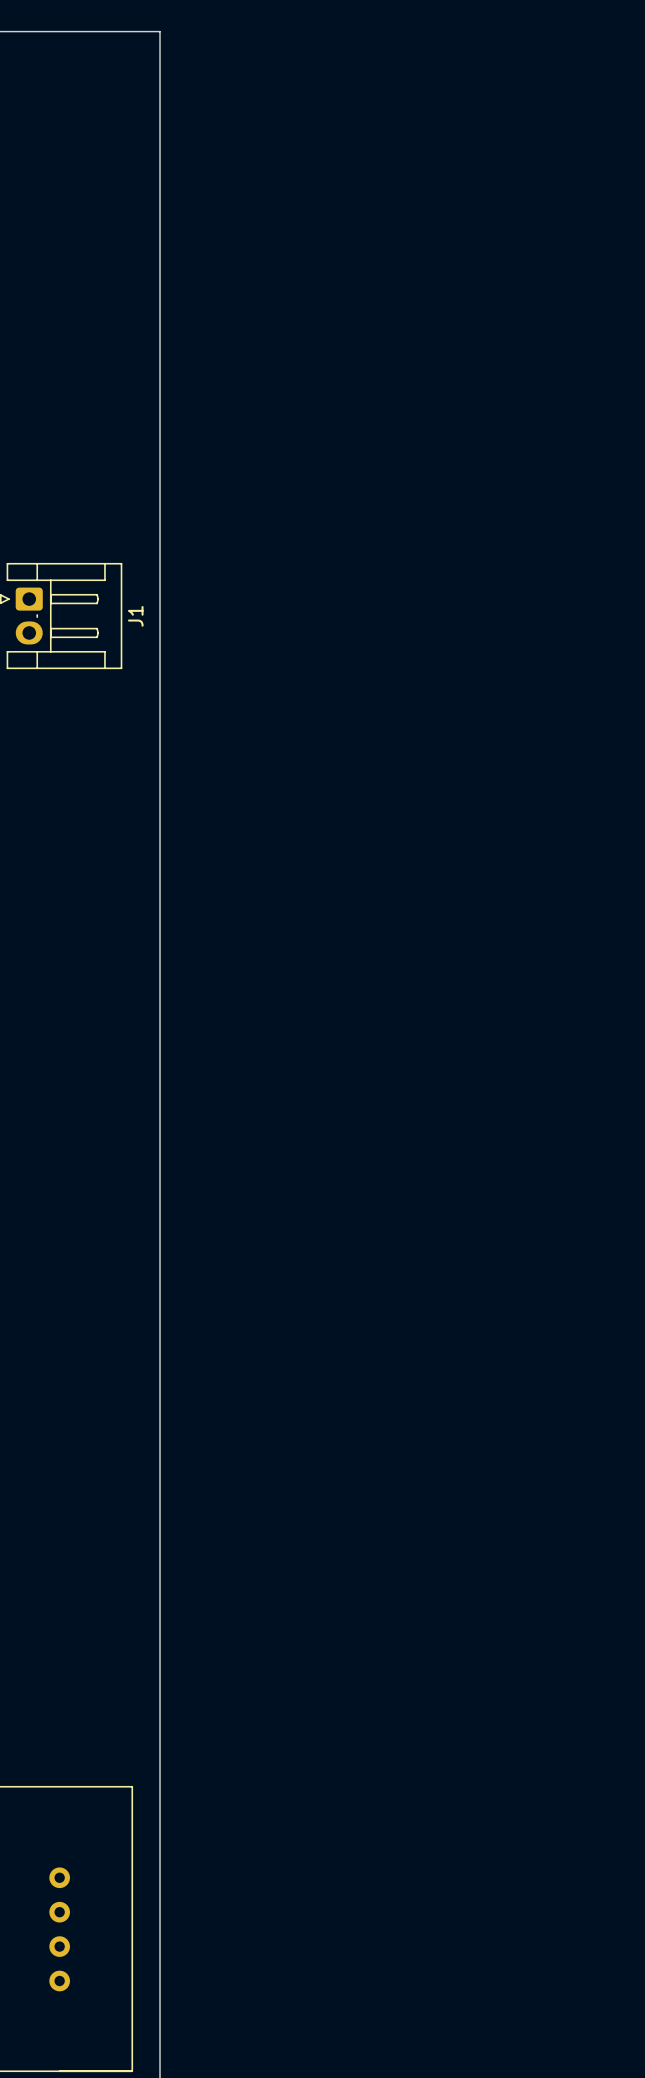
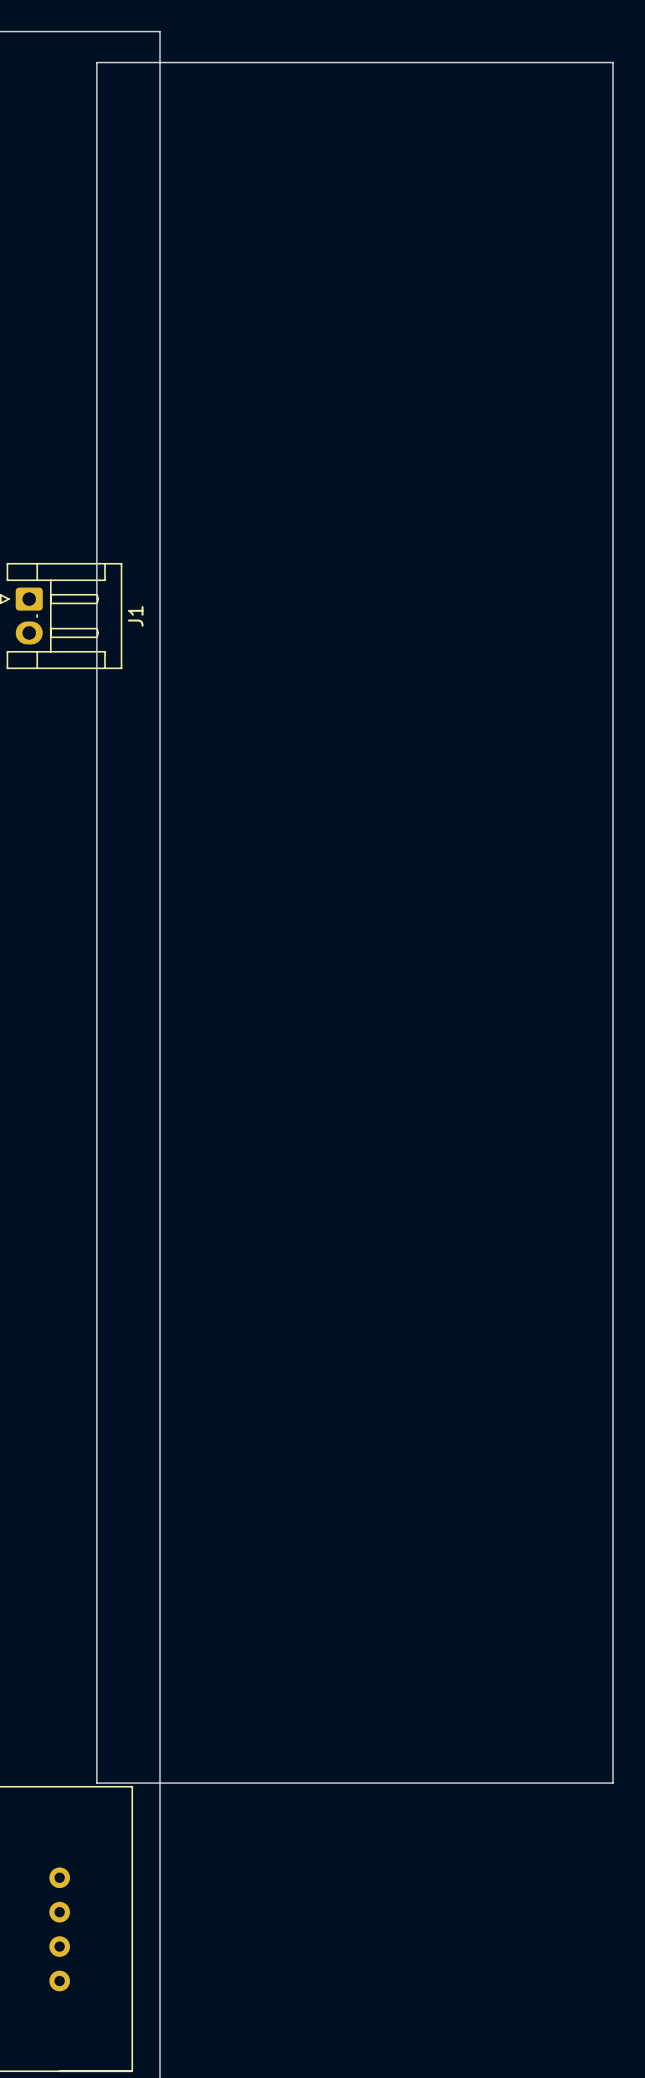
board edge: none -> (96, 62) (613, 62) (613, 1783) (96, 1783) (96, 62)

